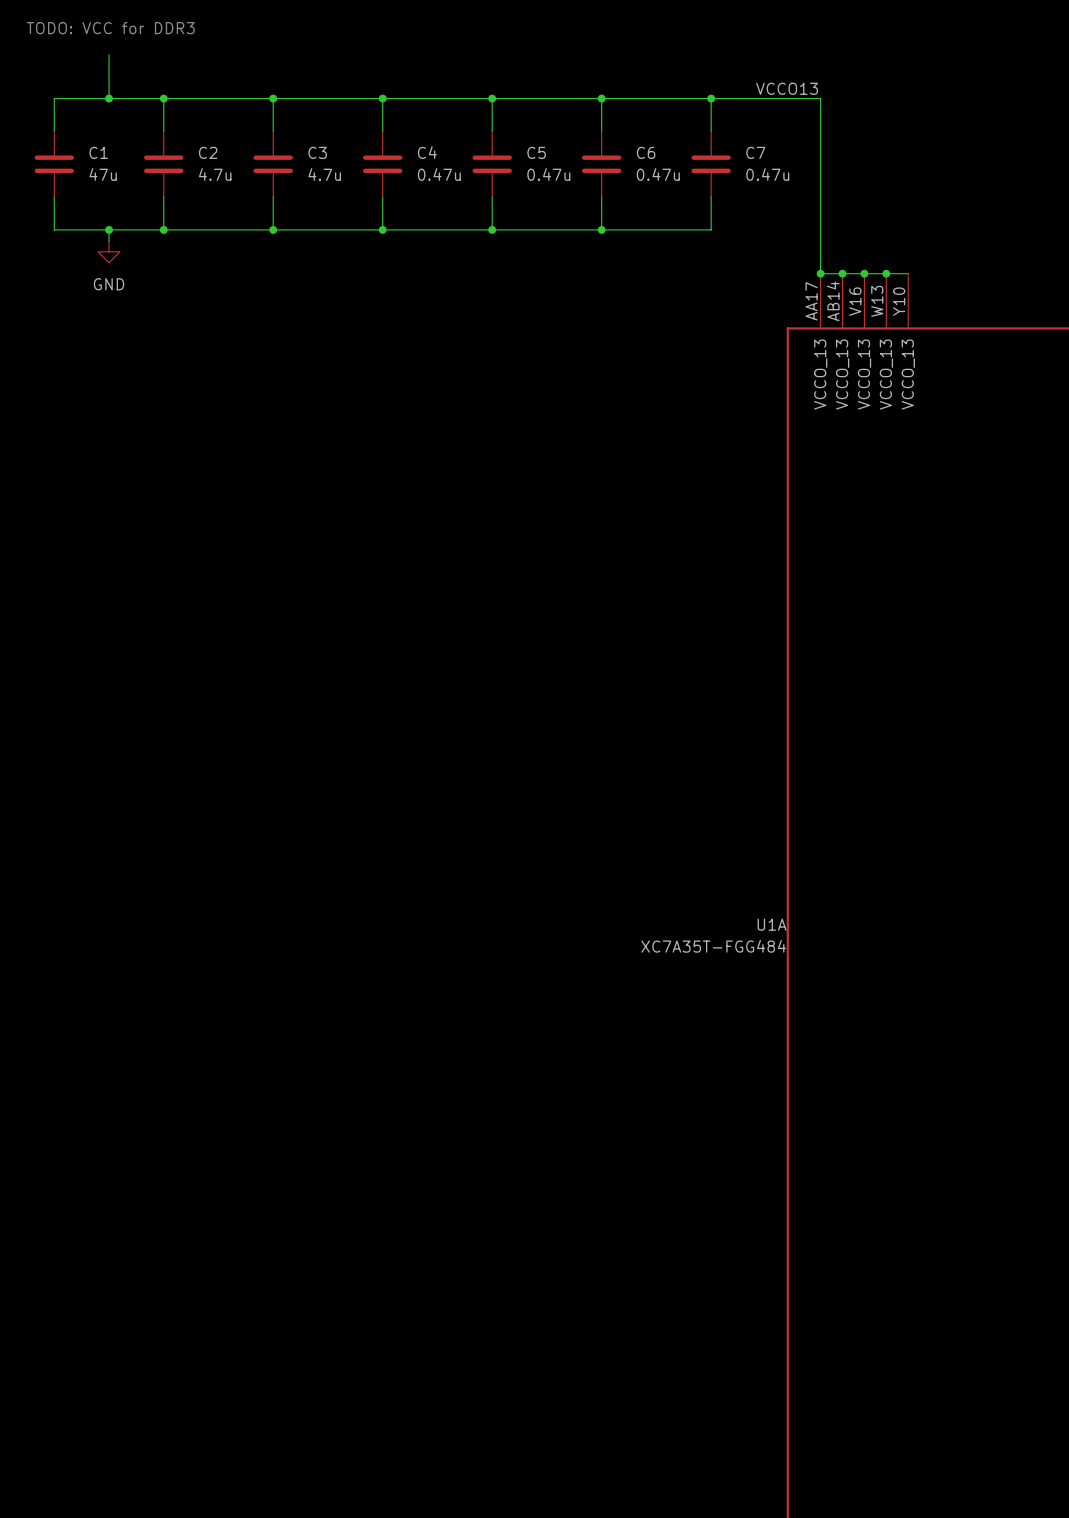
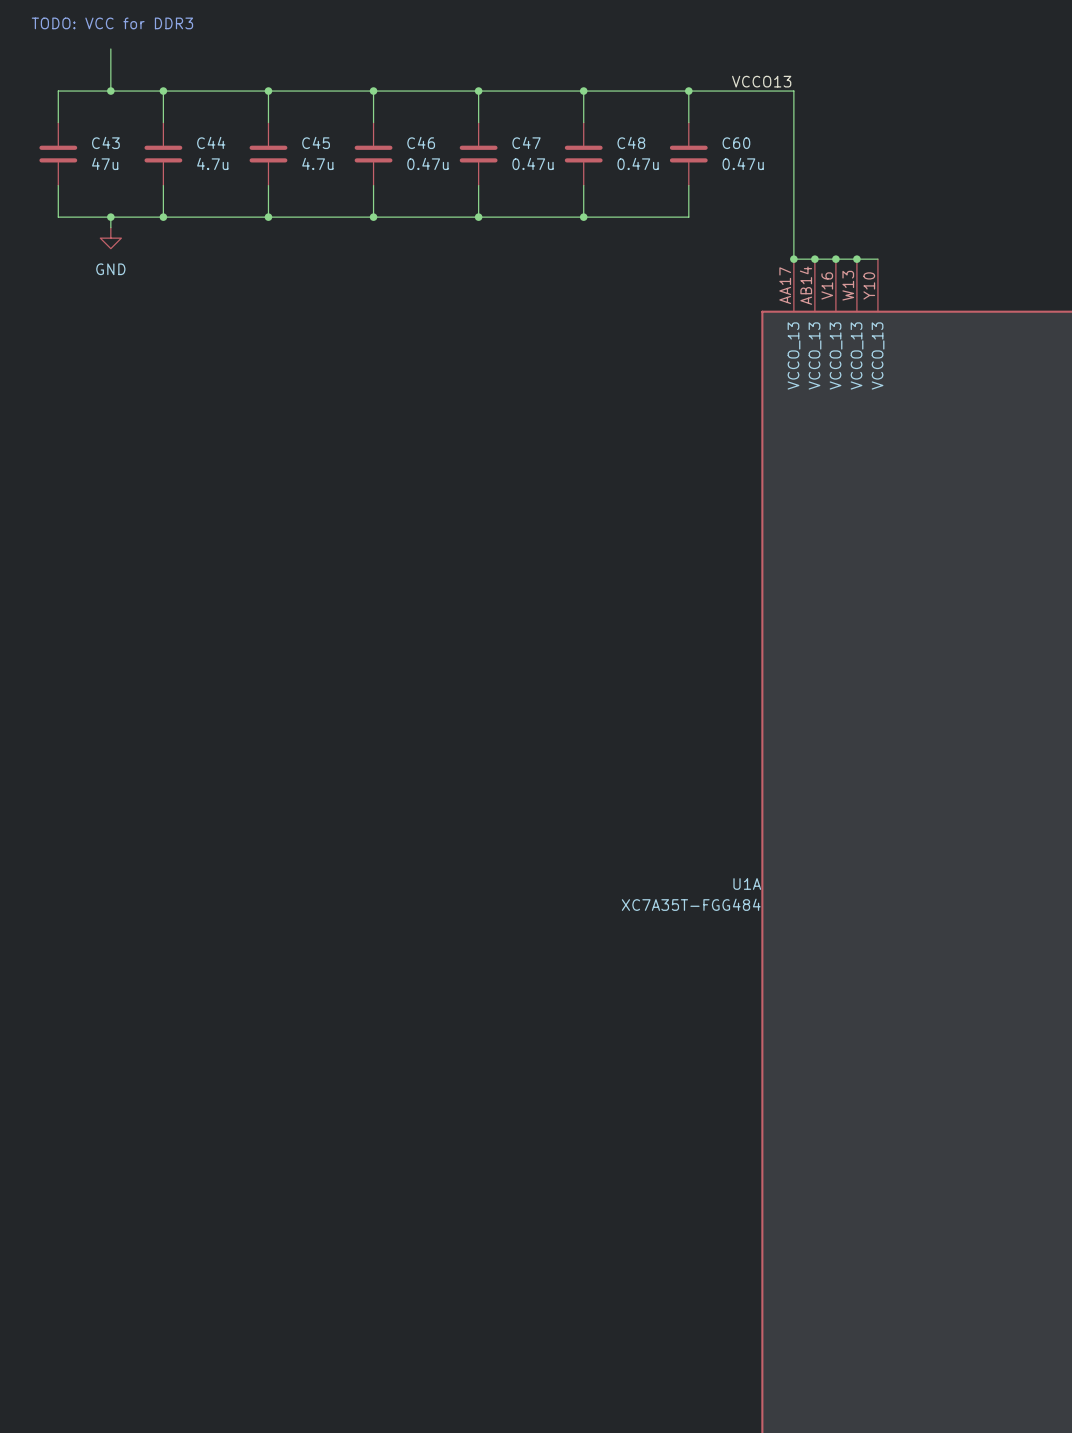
C1 name: C1 (98, 152) -> C43 (105, 142)
C2 name: C2 (208, 152) -> C44 (211, 142)
C3 name: C3 (317, 152) -> C45 (316, 142)
C4 name: C4 (427, 152) -> C46 (421, 142)
C5 name: C5 (536, 152) -> C47 (526, 142)
C6 name: C6 (646, 152) -> C48 (631, 142)
C7 name: C7 (755, 152) -> C60 (736, 143)

